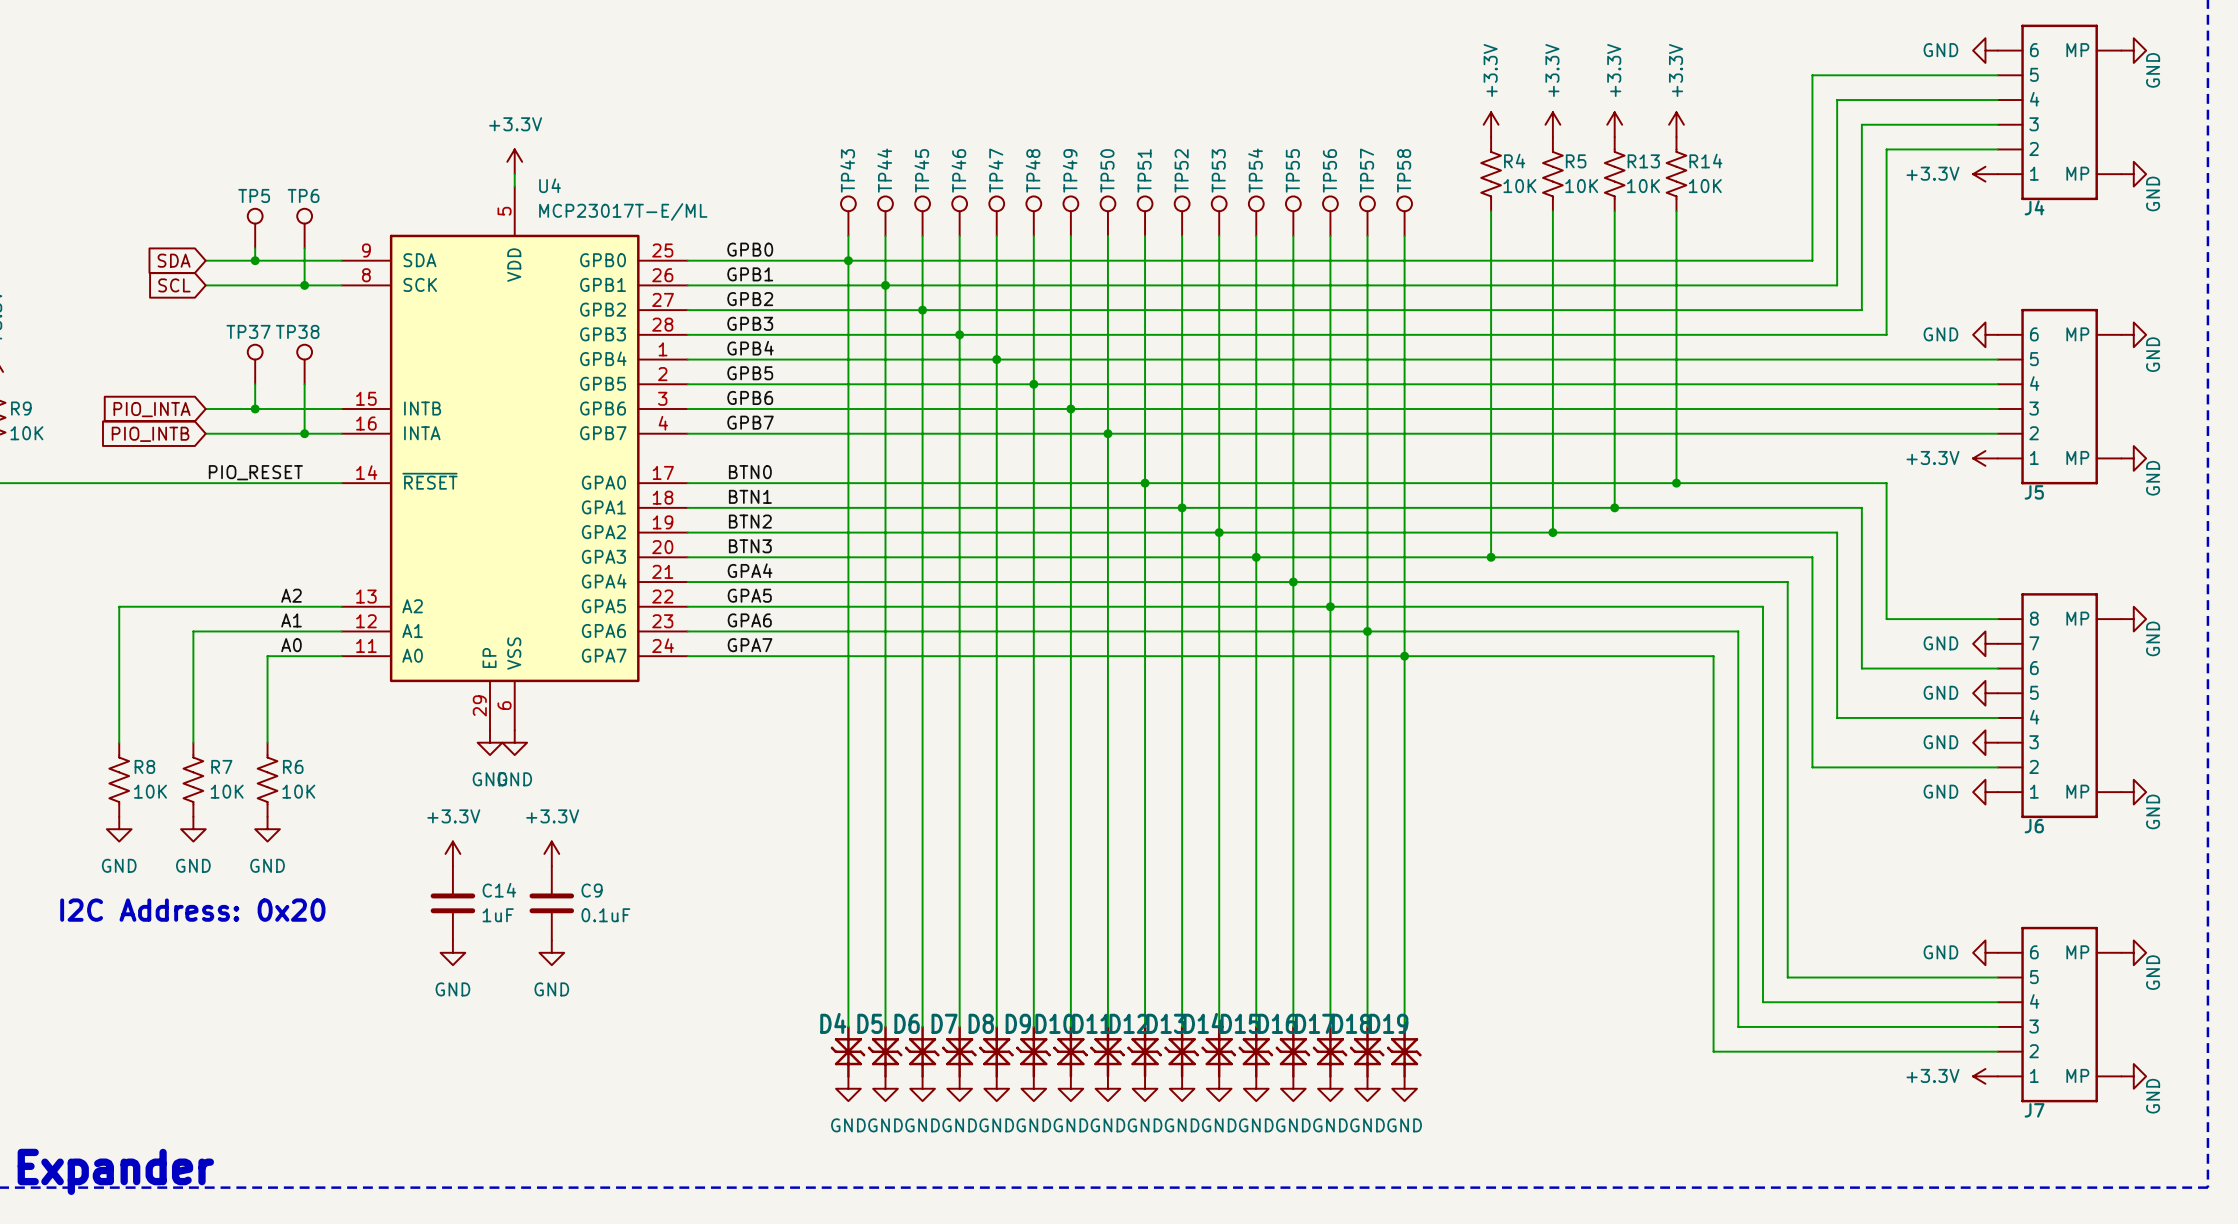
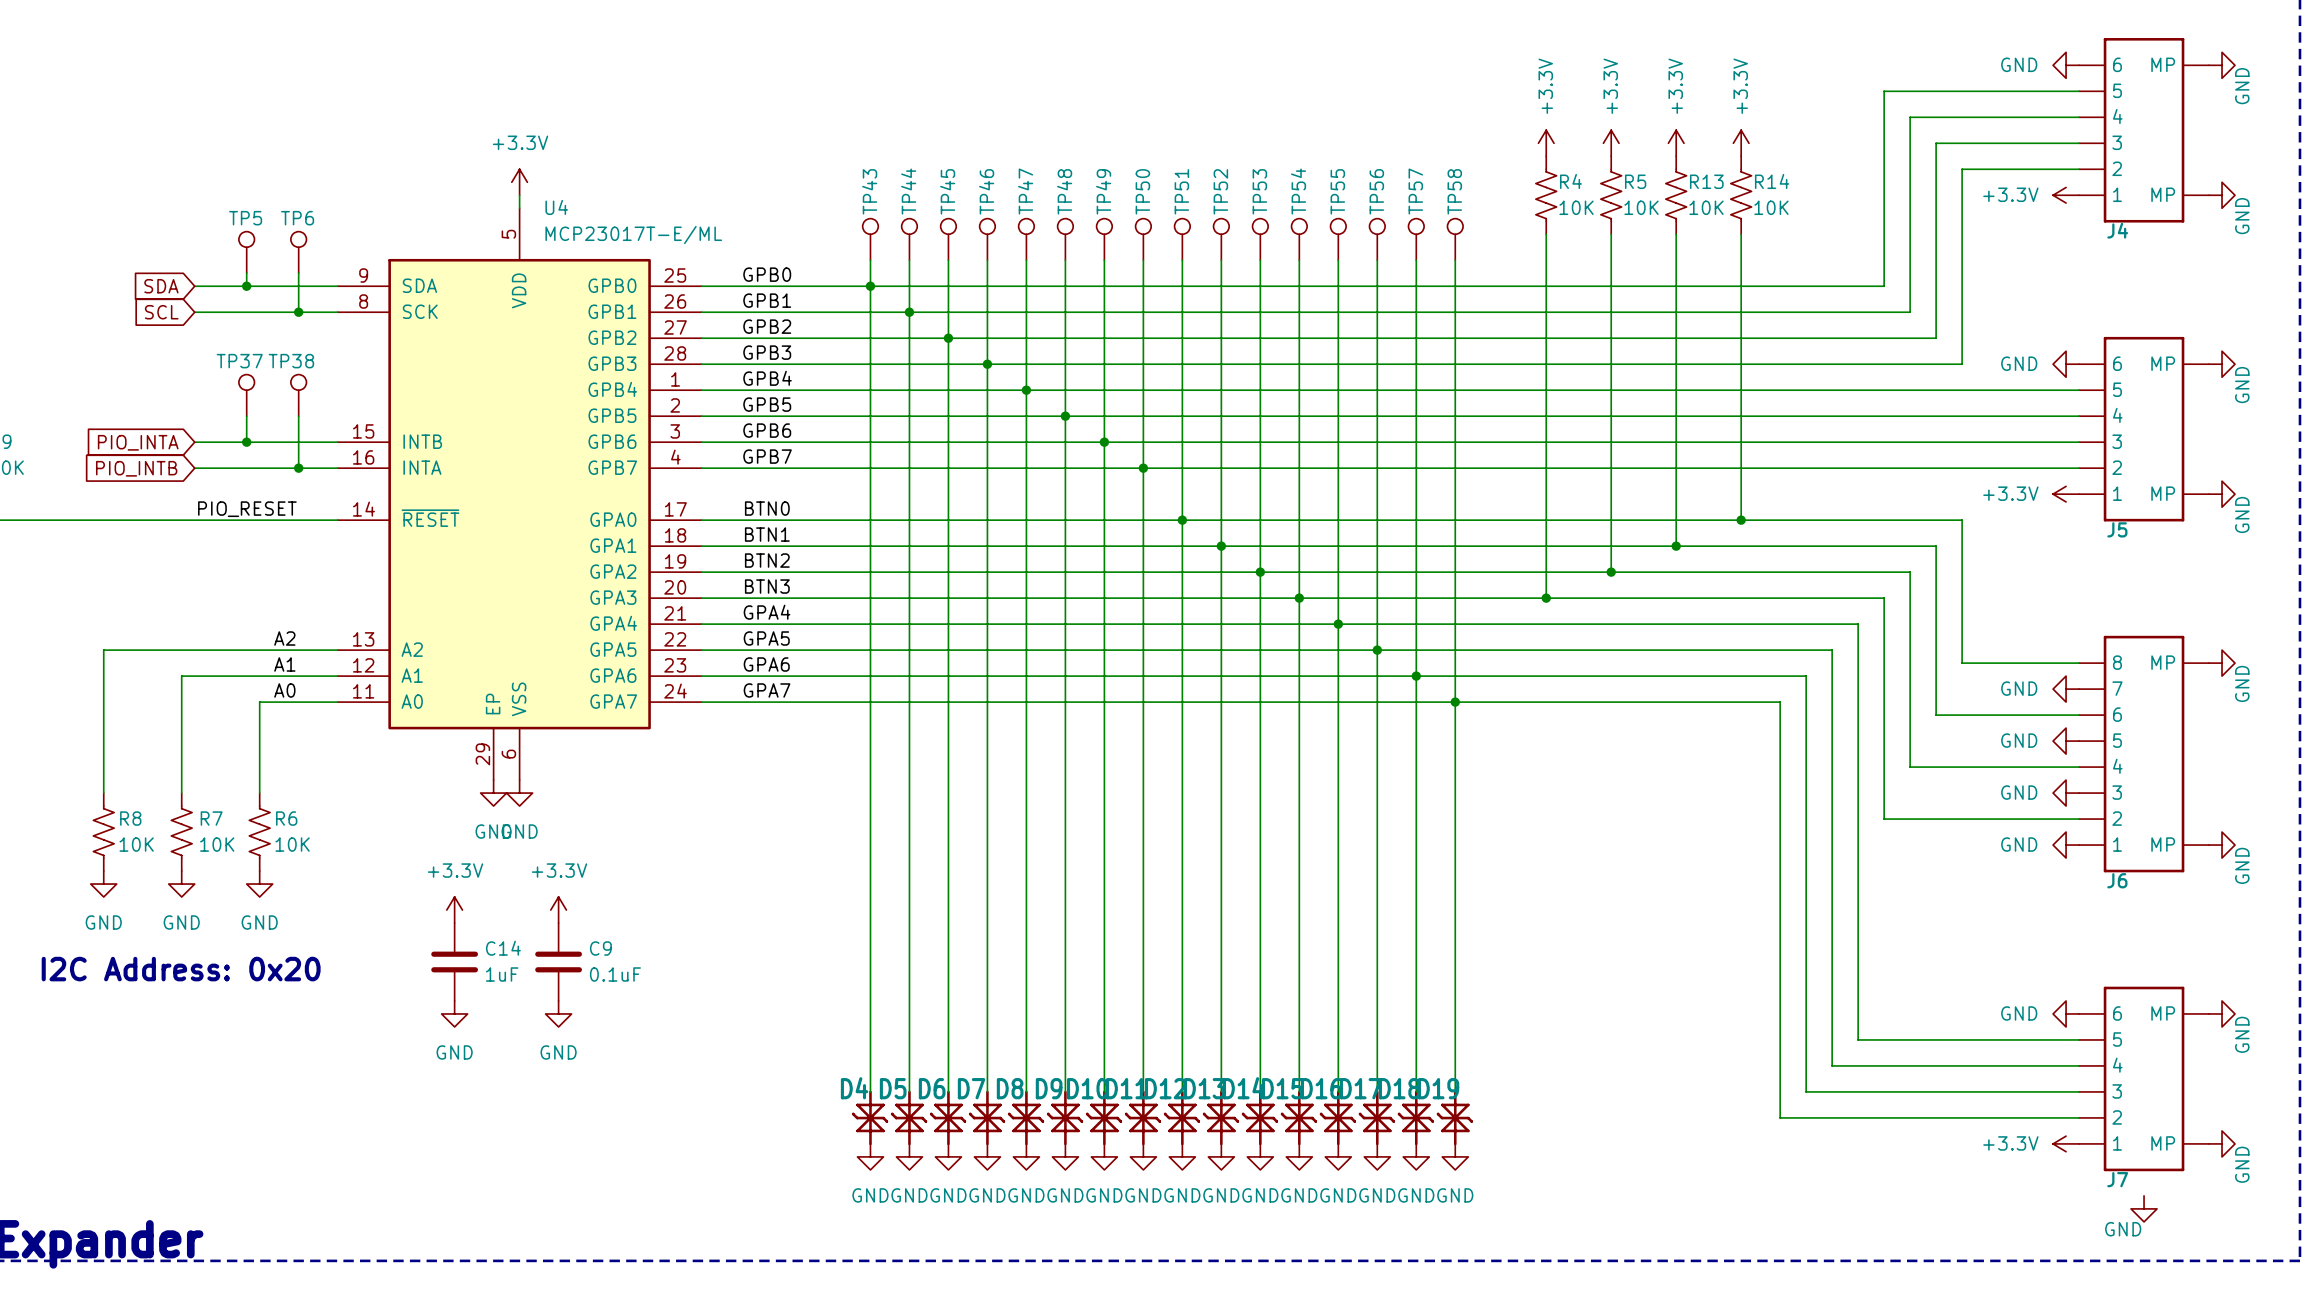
power symbol: none -> GND (2144, 1208)

